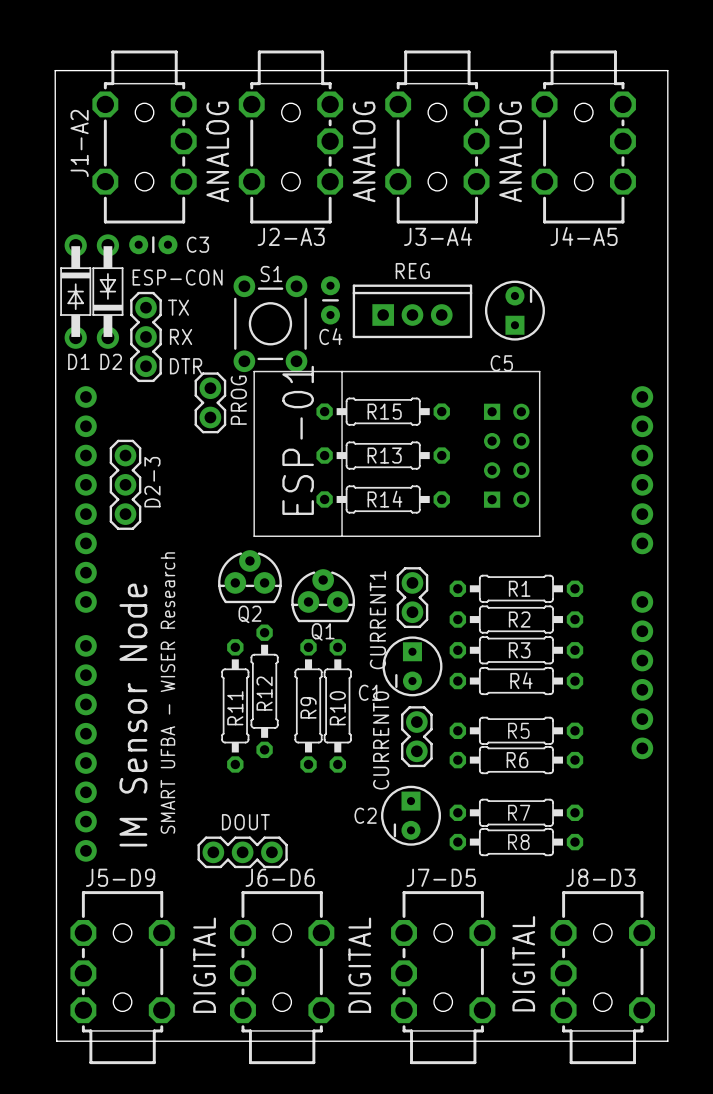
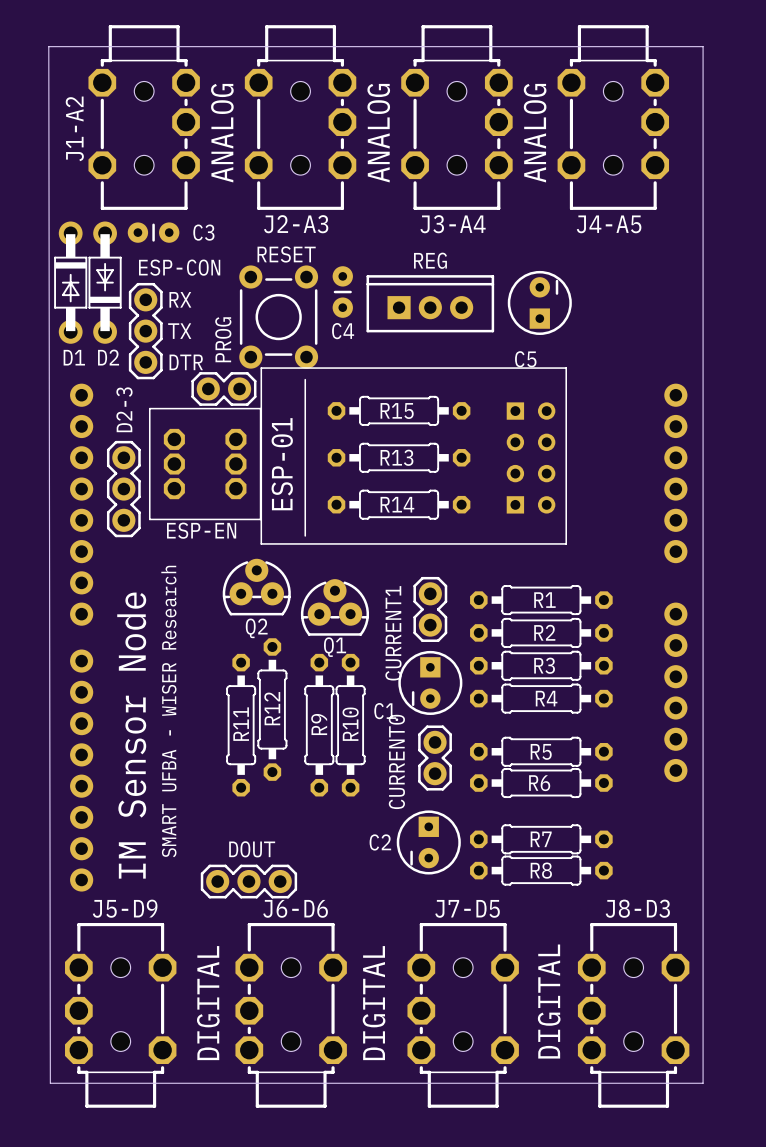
S1 name: S1 (271, 274) -> RESET (286, 254)
text: TX (178, 307) -> RX (180, 299)
text: RX (181, 336) -> TX (179, 331)
part footprint: [253, 370, 541, 537] -> [260, 367, 568, 545]
PROG name position: PROG (238, 400) -> PROG (223, 339)
PROG rotation: 0° (210, 402) -> 90° clockwise (223, 388)
ESP-EN: none -> (205, 464)
D2-3 name position: D2-3 (152, 482) -> D2-3 (124, 409)

